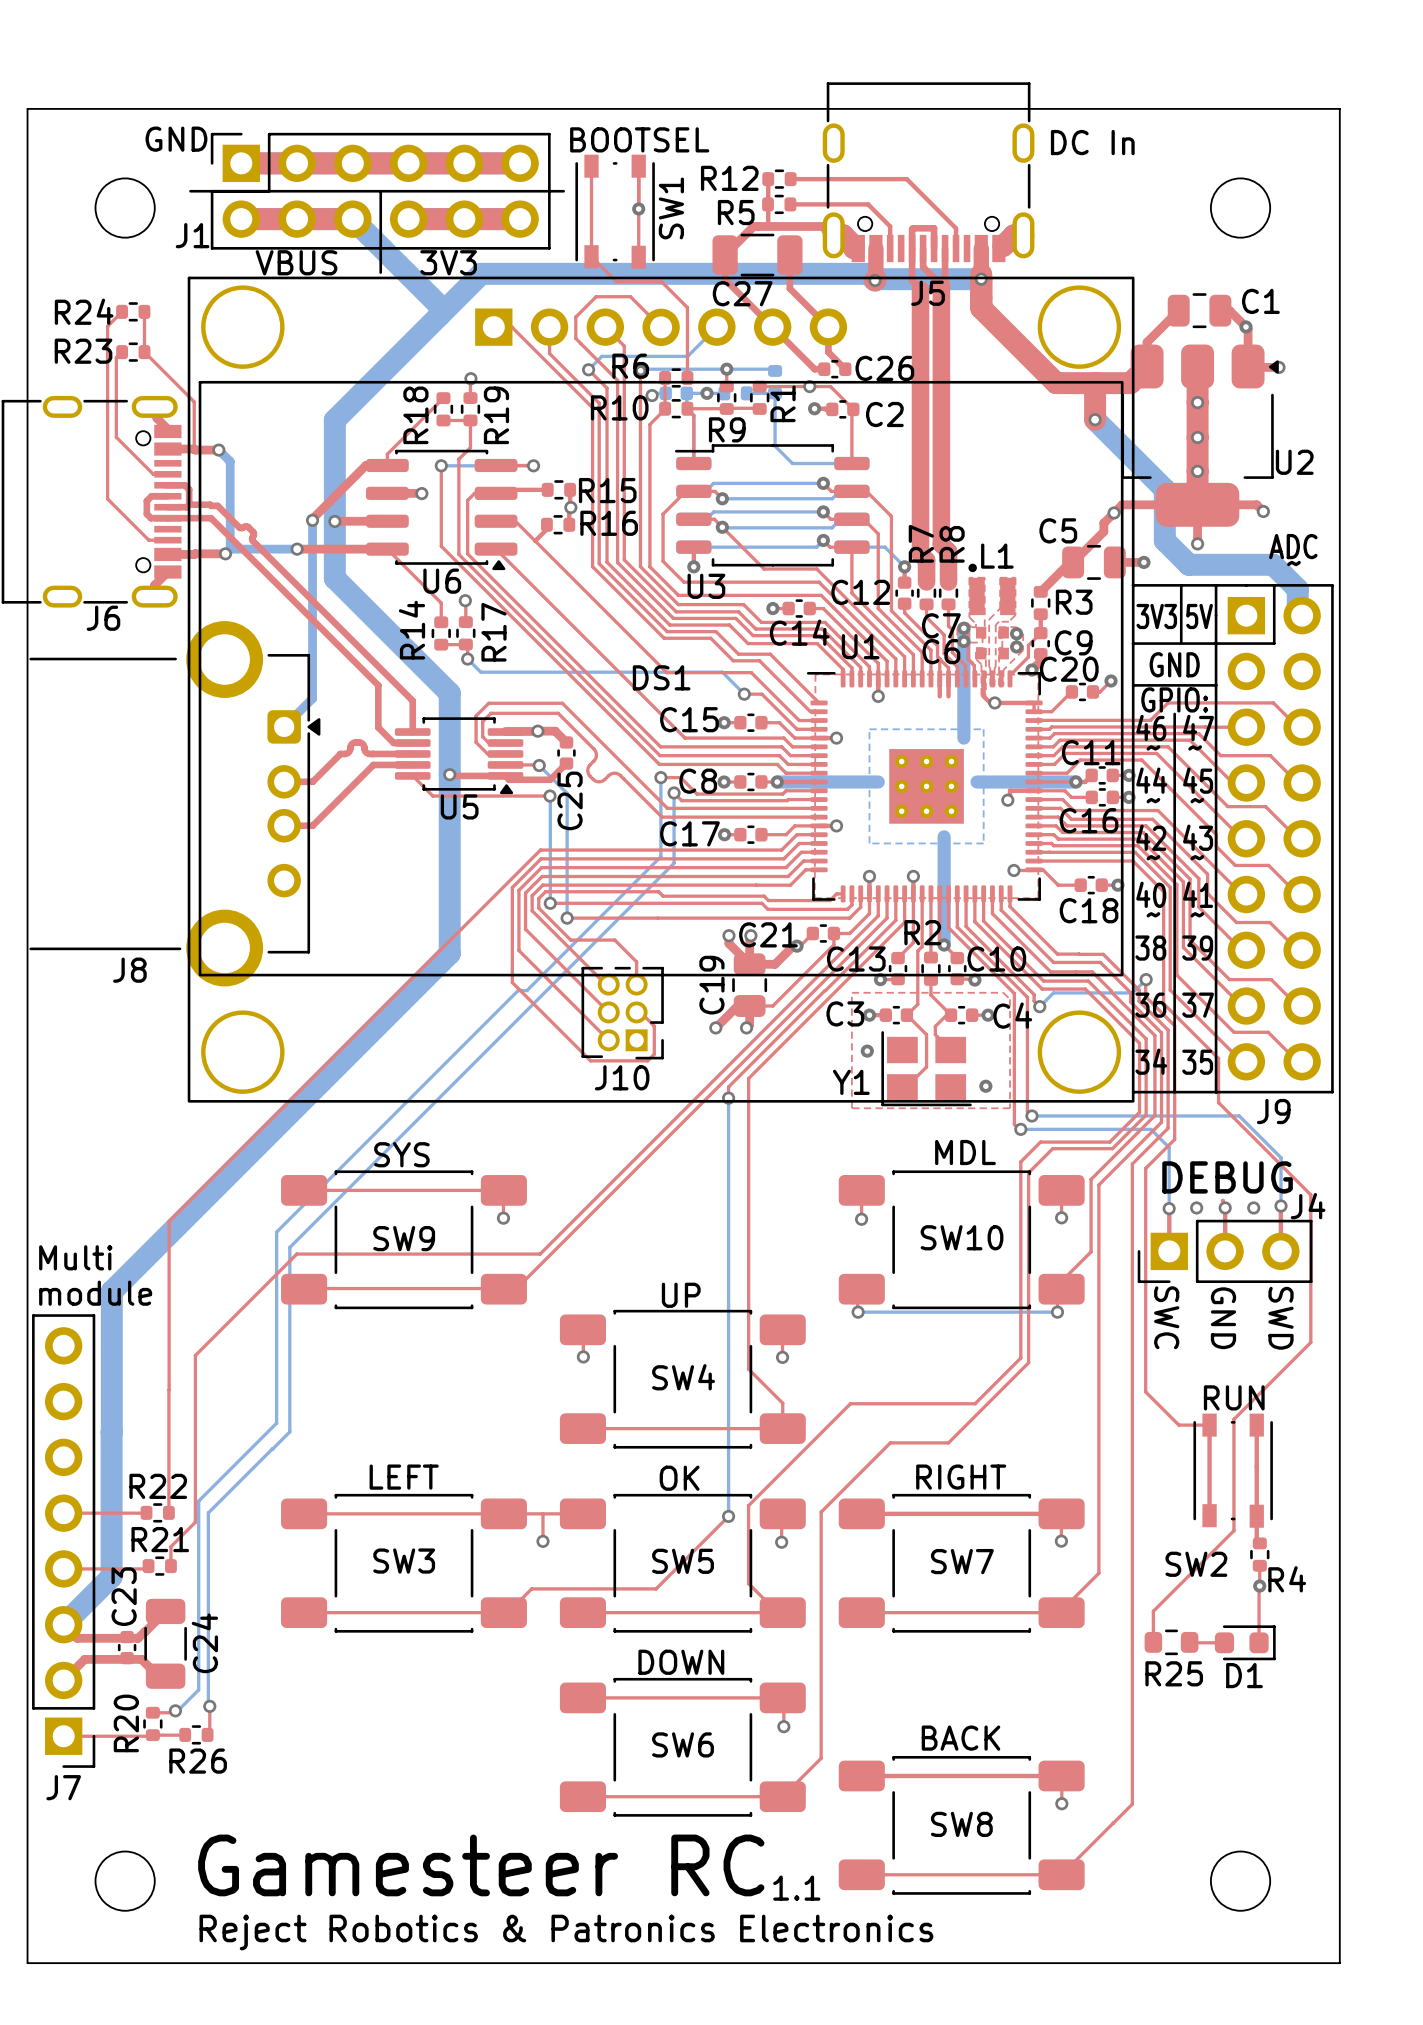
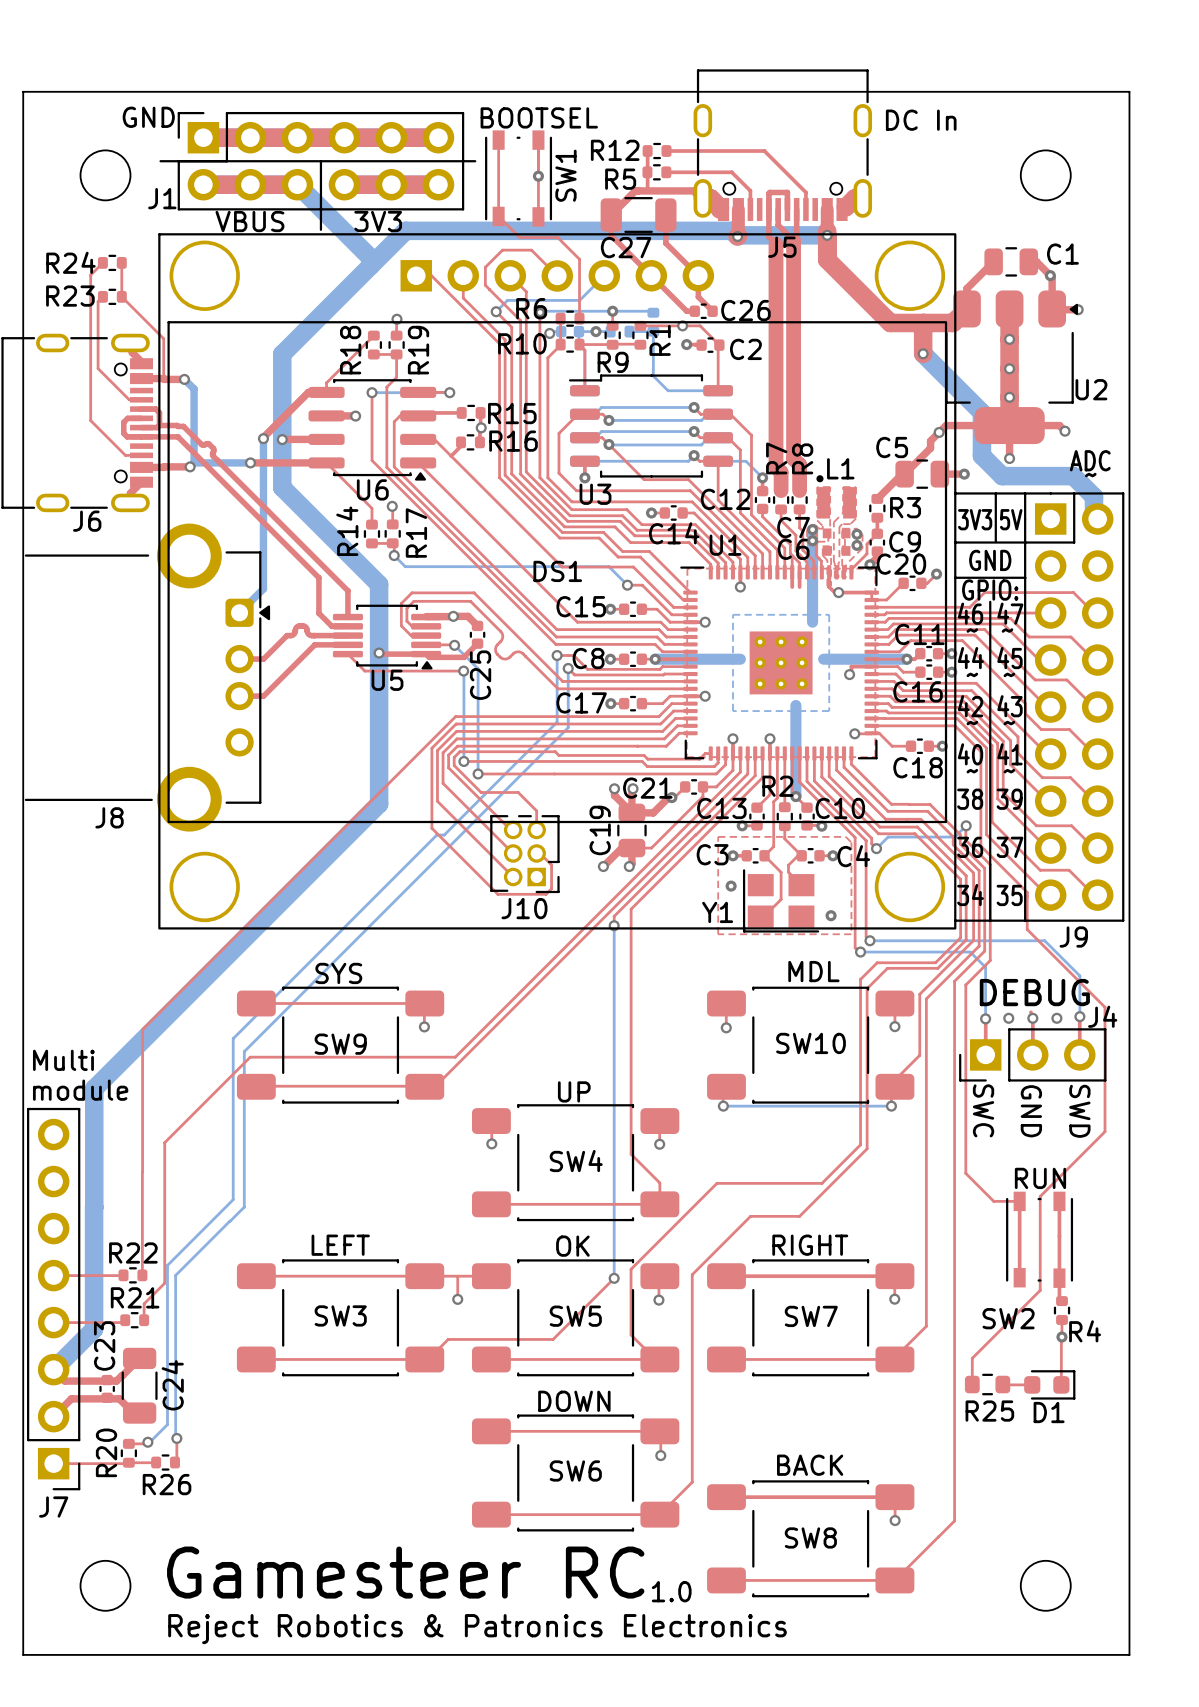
text: 1.1 (796, 1888) -> 1.0 (671, 1591)

